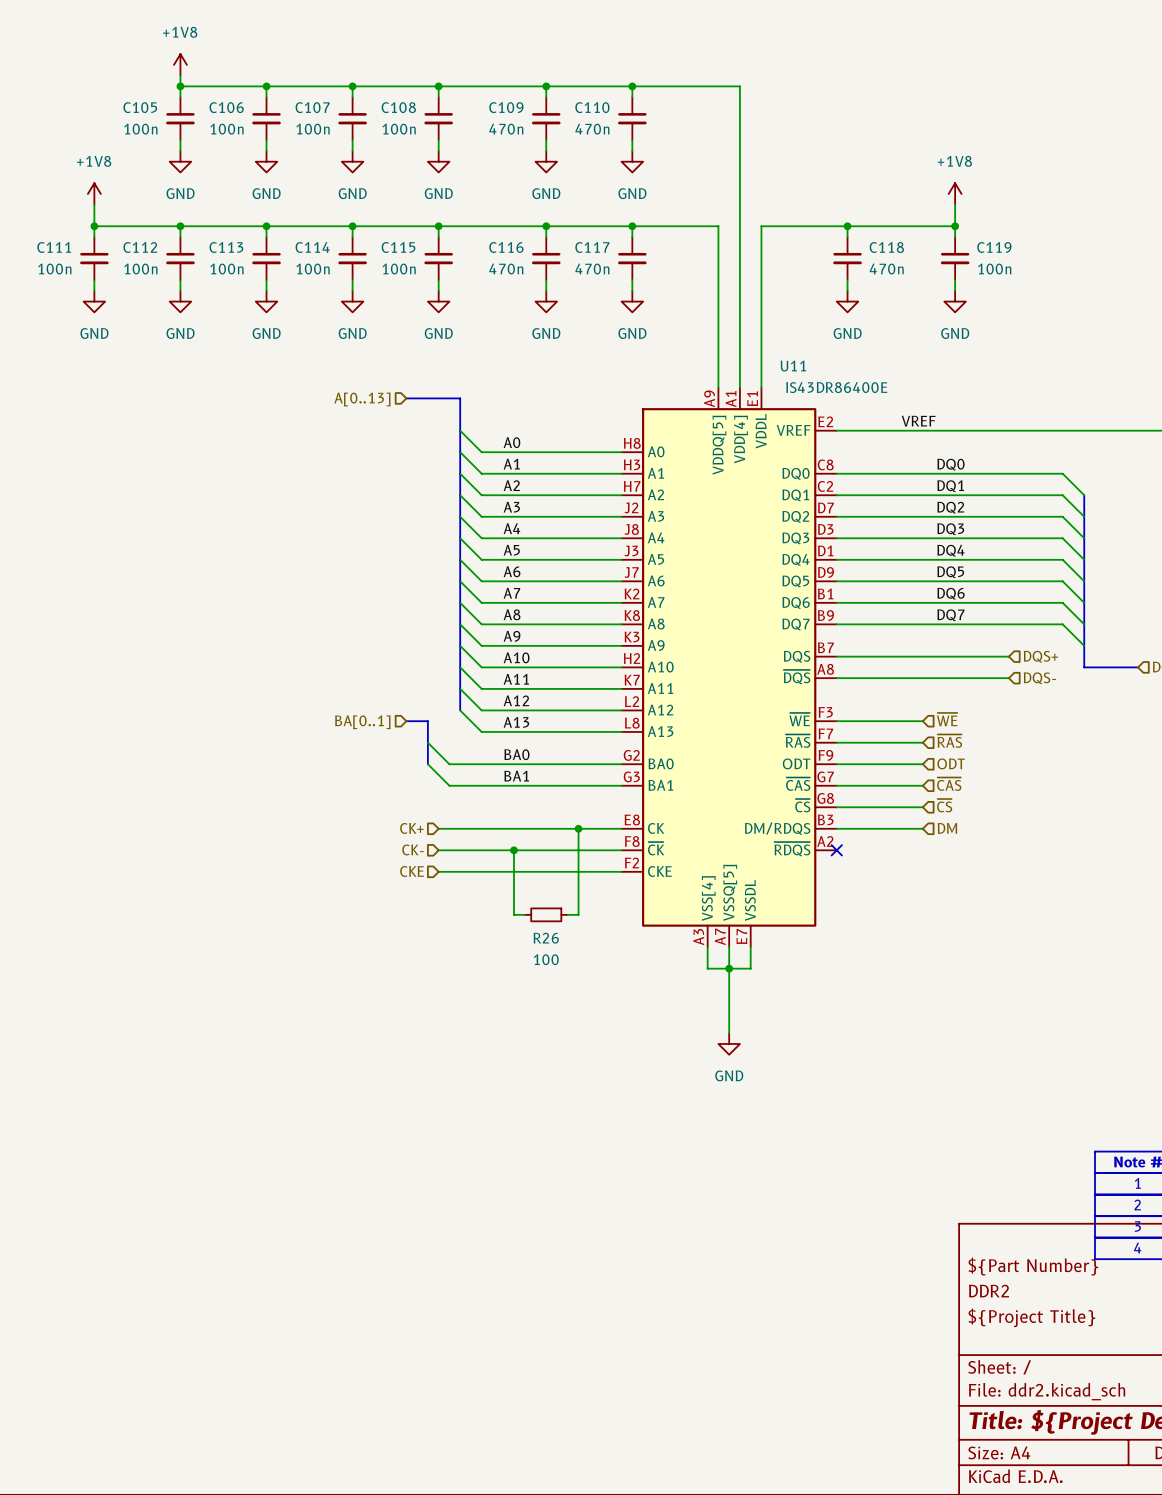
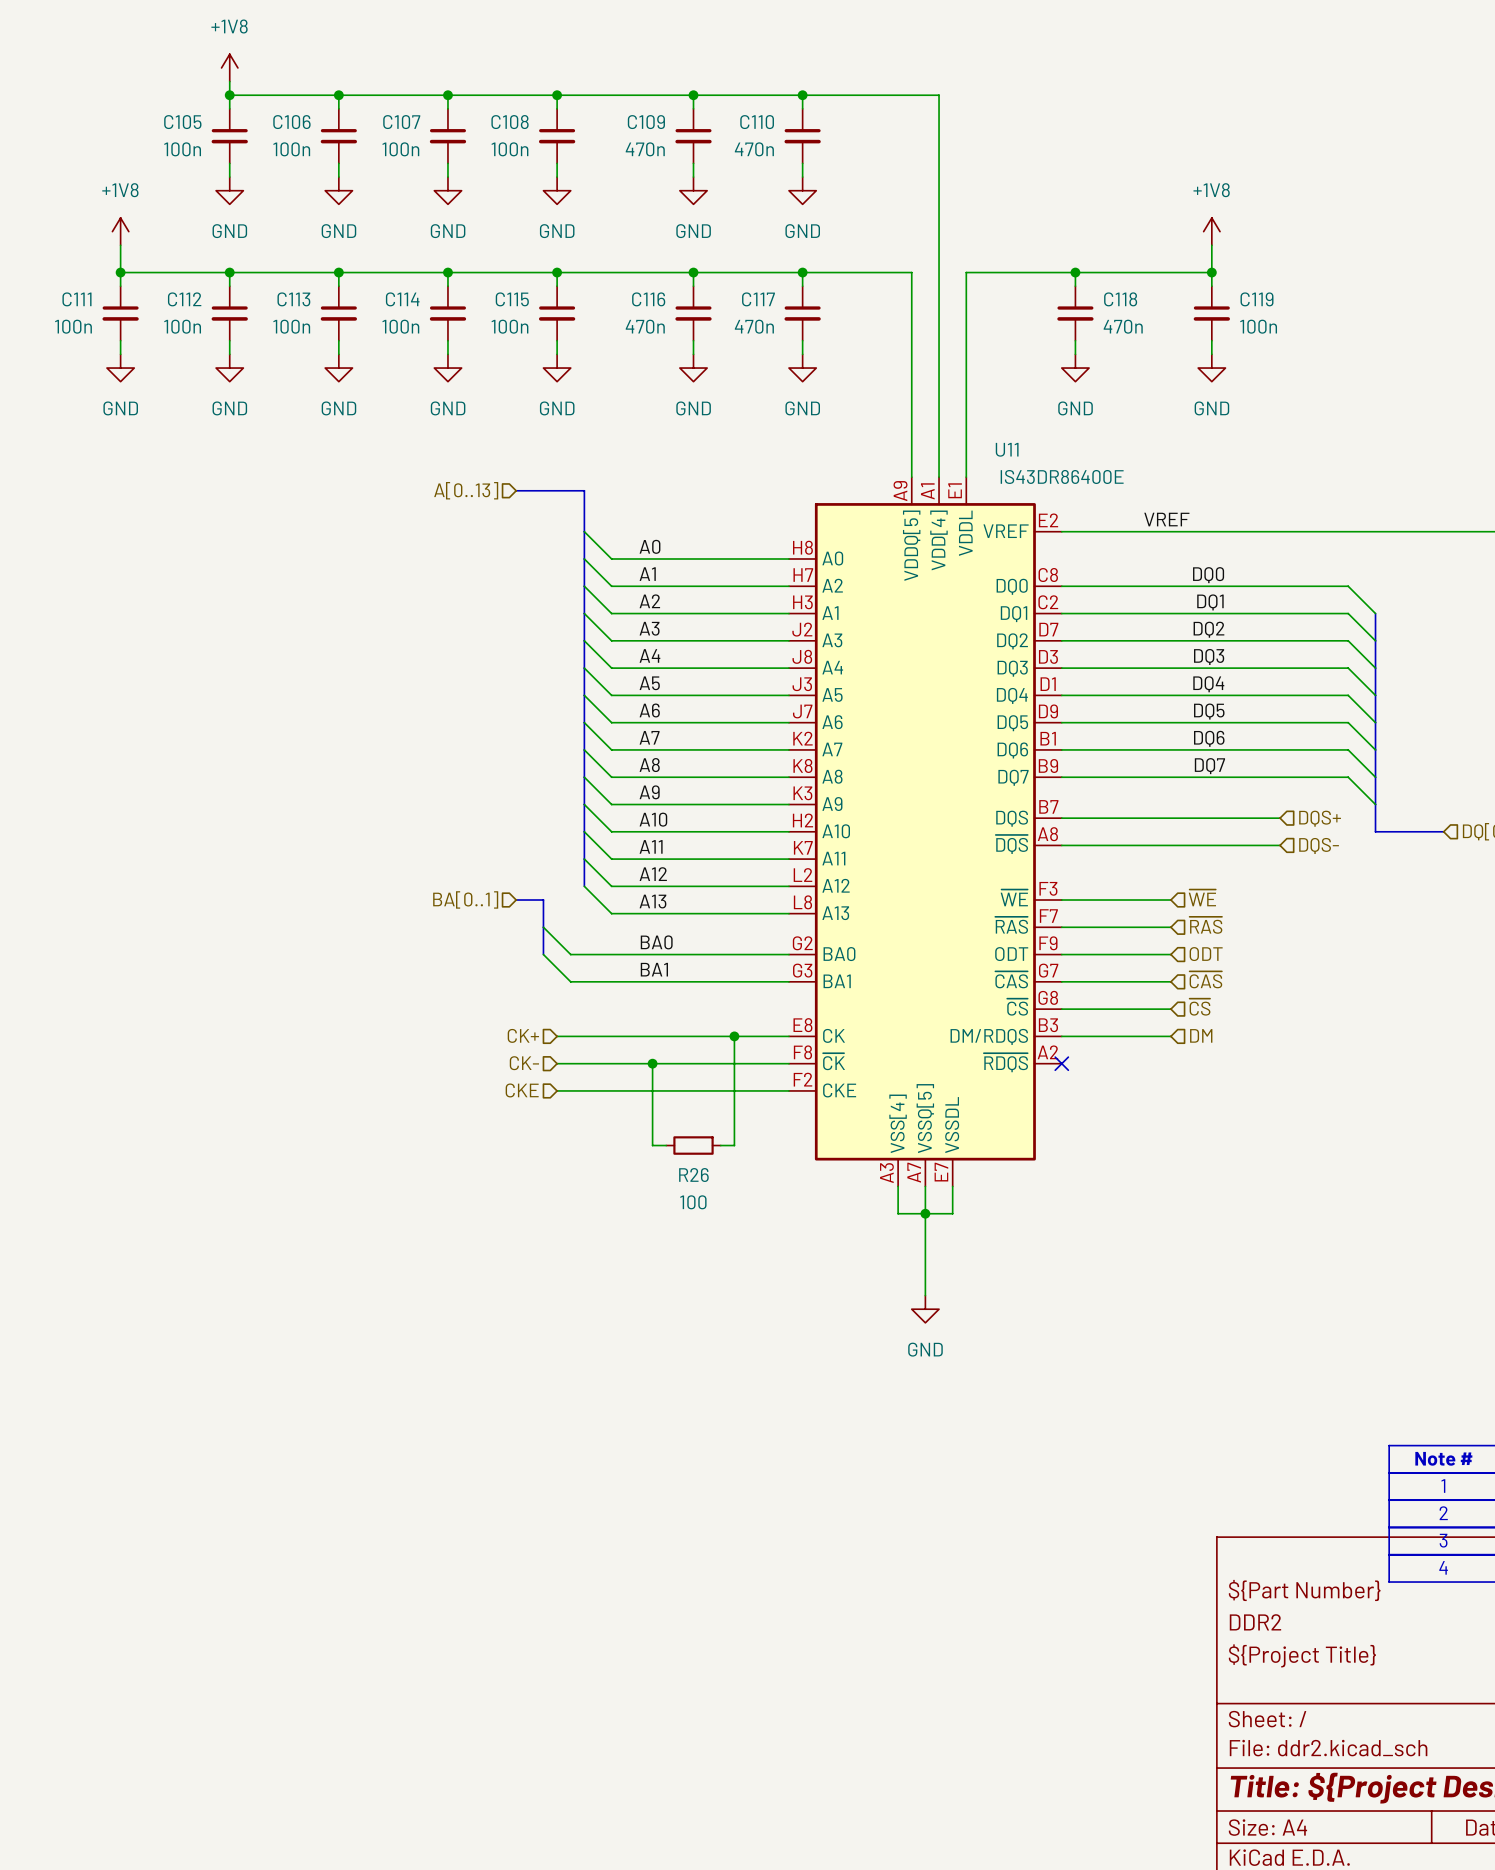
U11 pin number: H3 (632, 464) -> H7 (803, 575)
U11 pin name: A1 (655, 473) -> A2 (832, 585)
U11 pin number: H7 (632, 486) -> H3 (802, 602)
U11 pin name: A2 (655, 494) -> A1 (830, 613)

